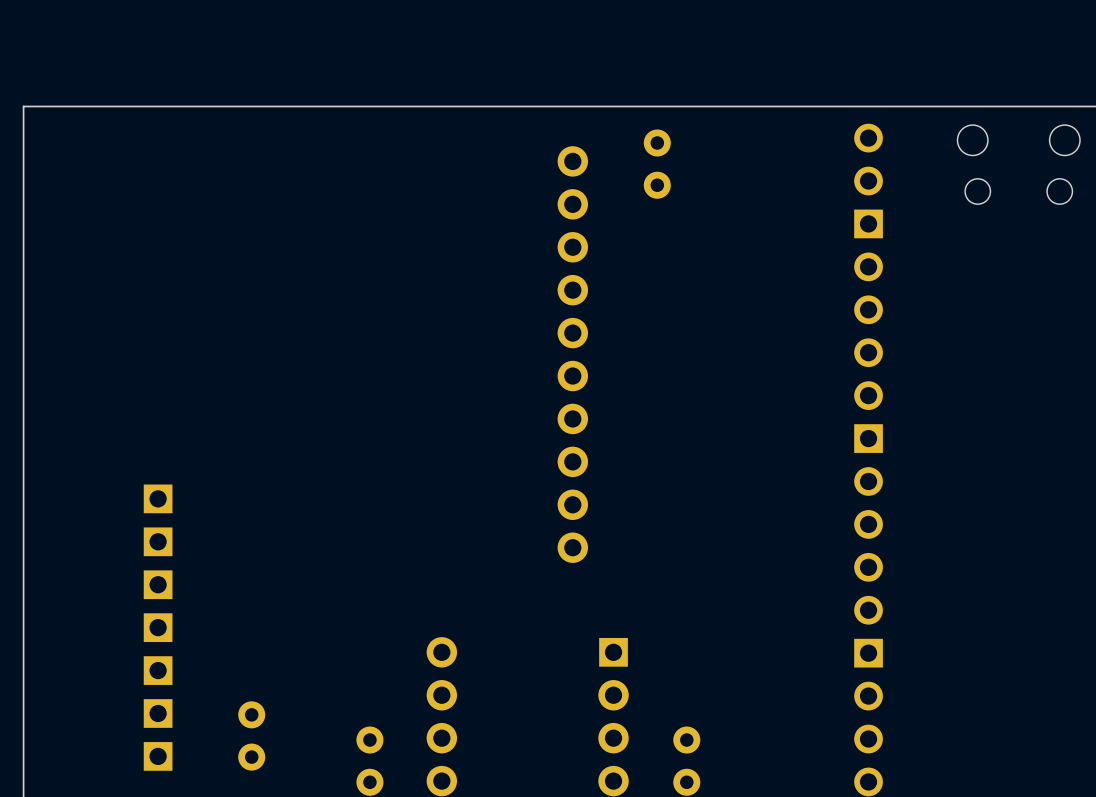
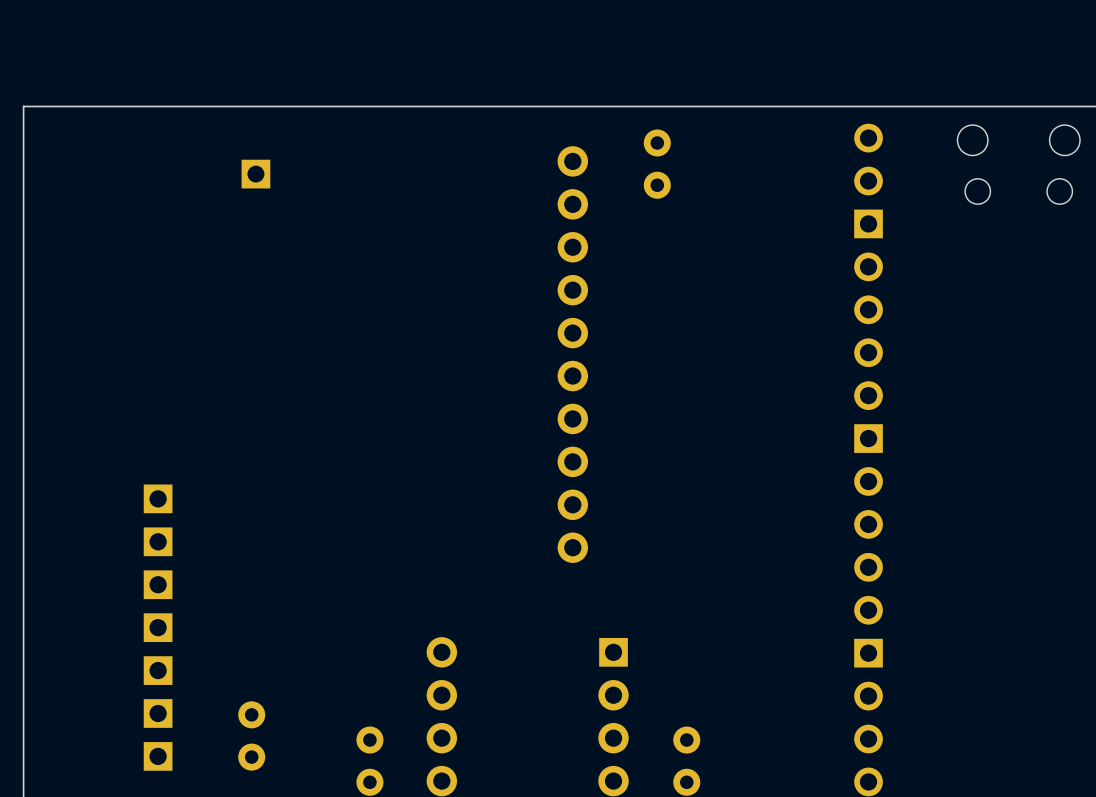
part: none -> (255, 174)

